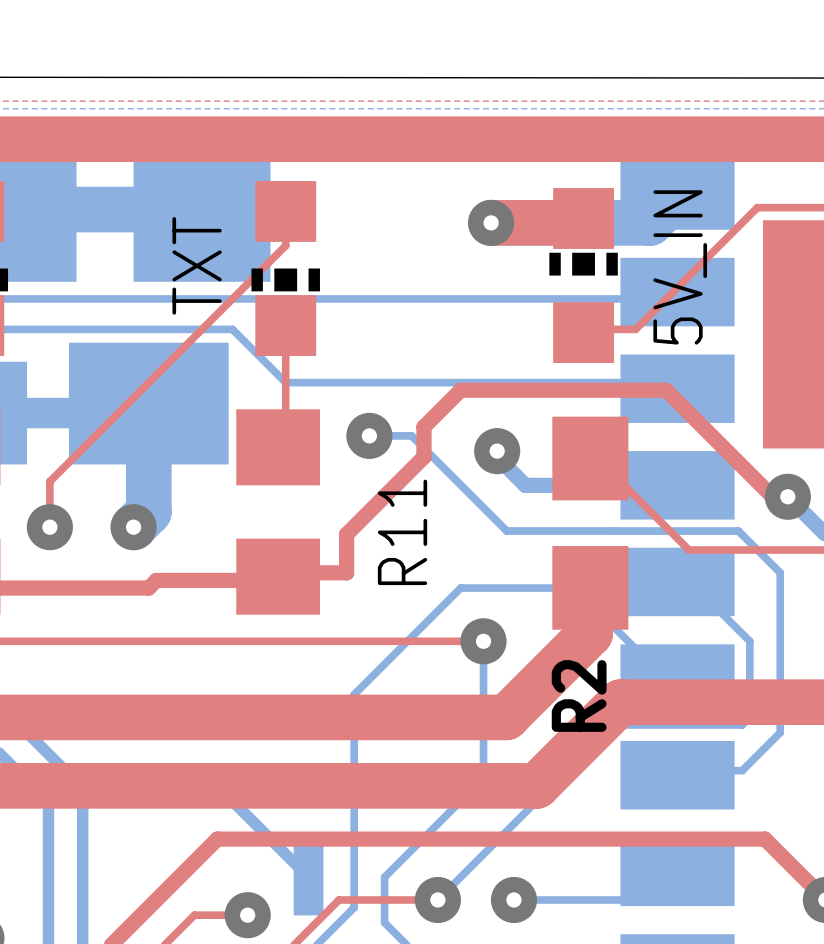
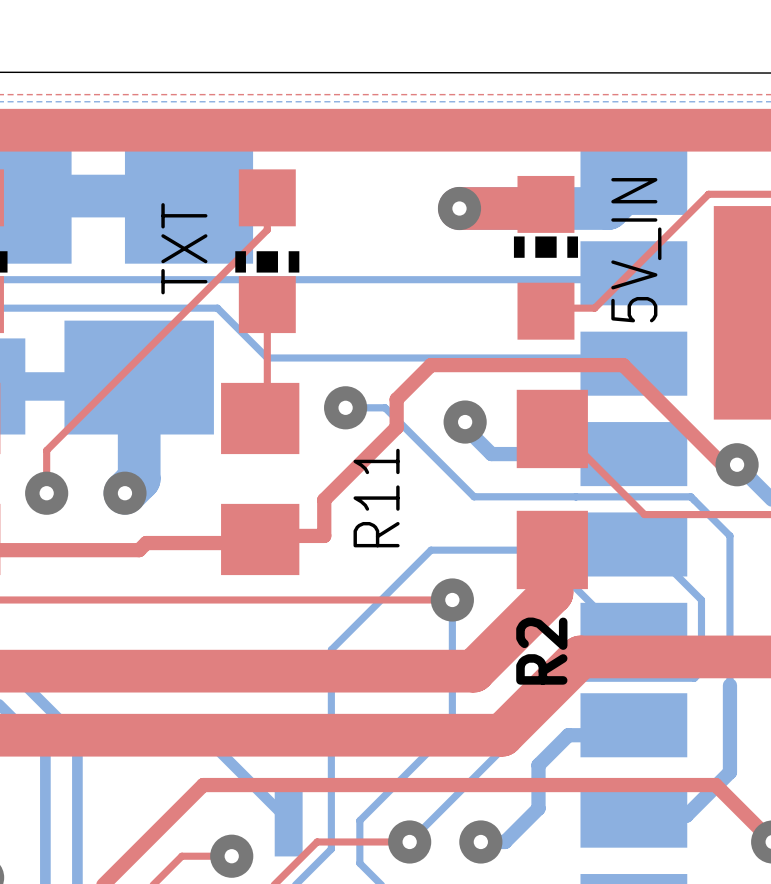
bottom track: (780, 732) (742, 770) (681, 770) (677, 775) -> (729, 685) (729, 772) (686, 815) (633, 815)
bottom track: (677, 871) (650, 899) (539, 899) -> (633, 725) (623, 735) (568, 735) (538, 765) (538, 808) (505, 841)

